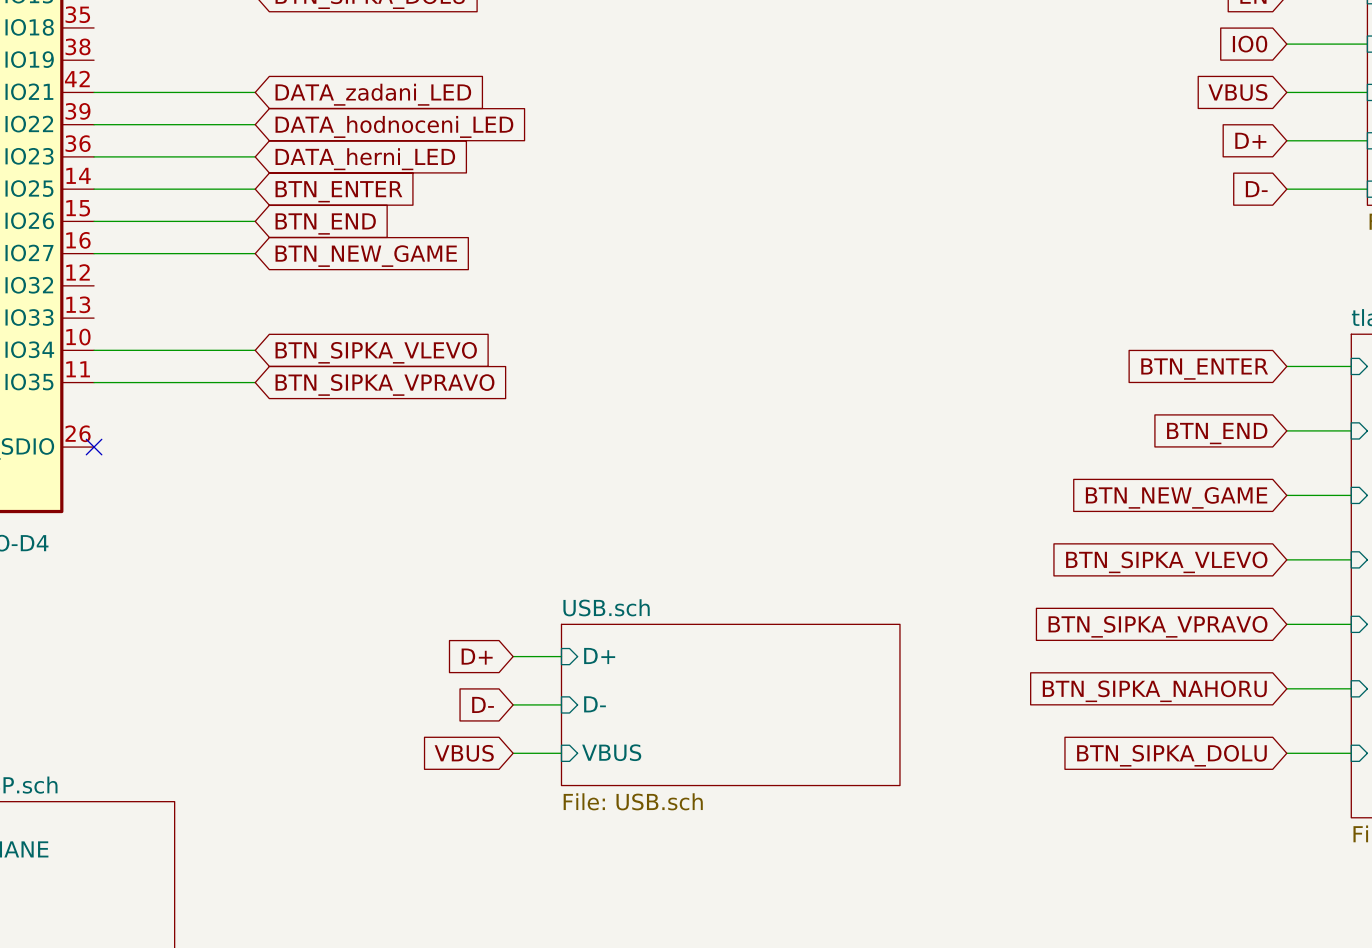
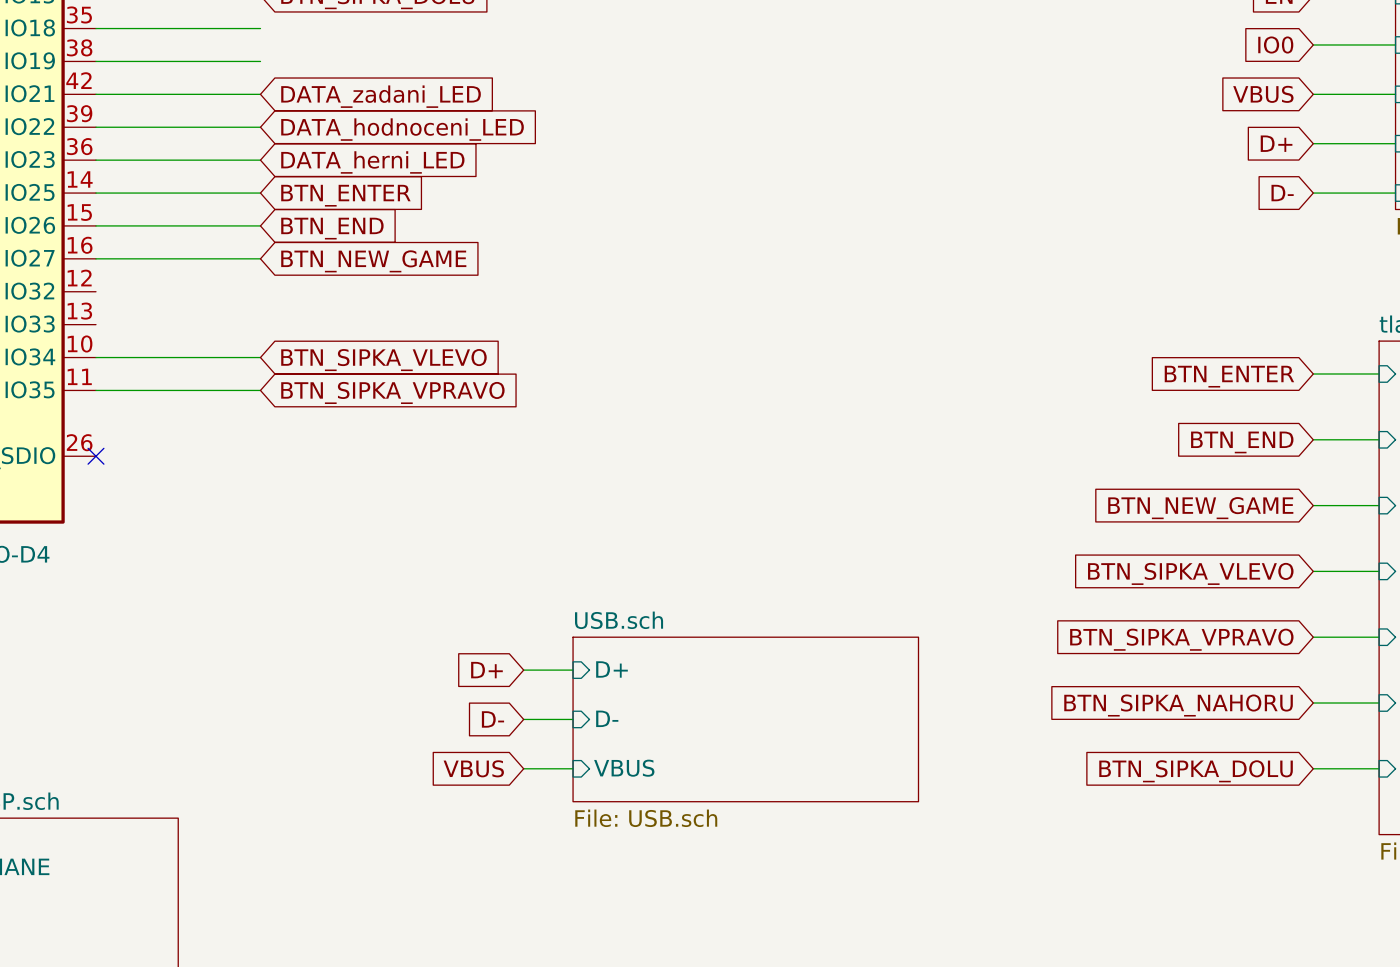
wire: none -> (95, 28) (260, 28)
wire: none -> (95, 61) (260, 61)

